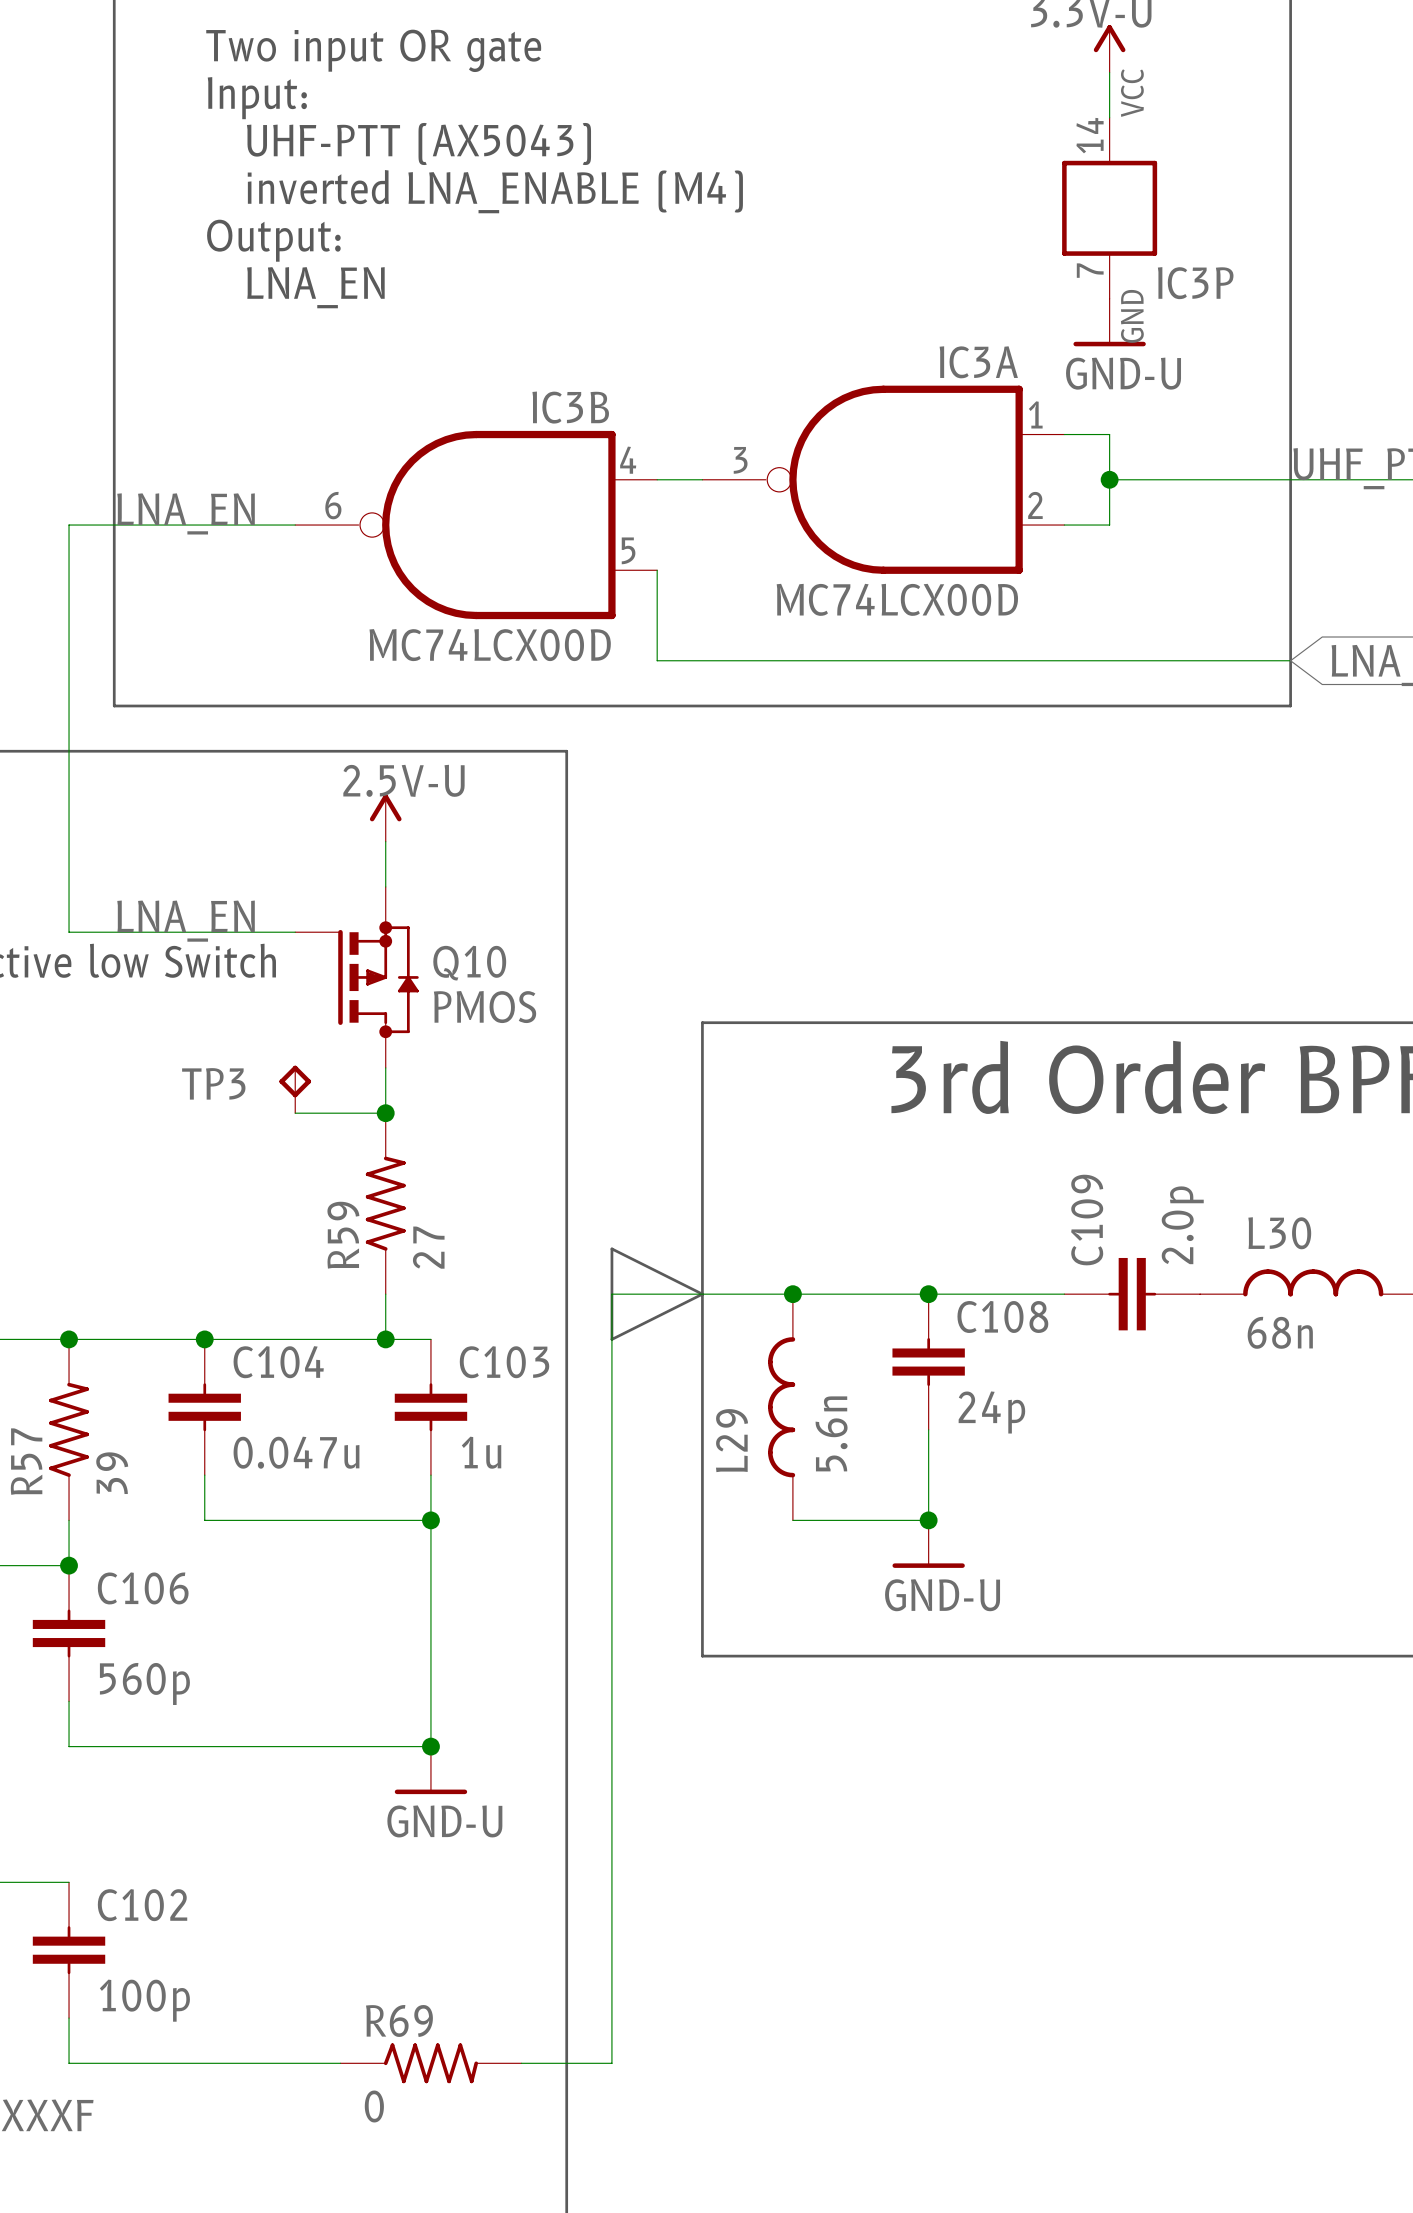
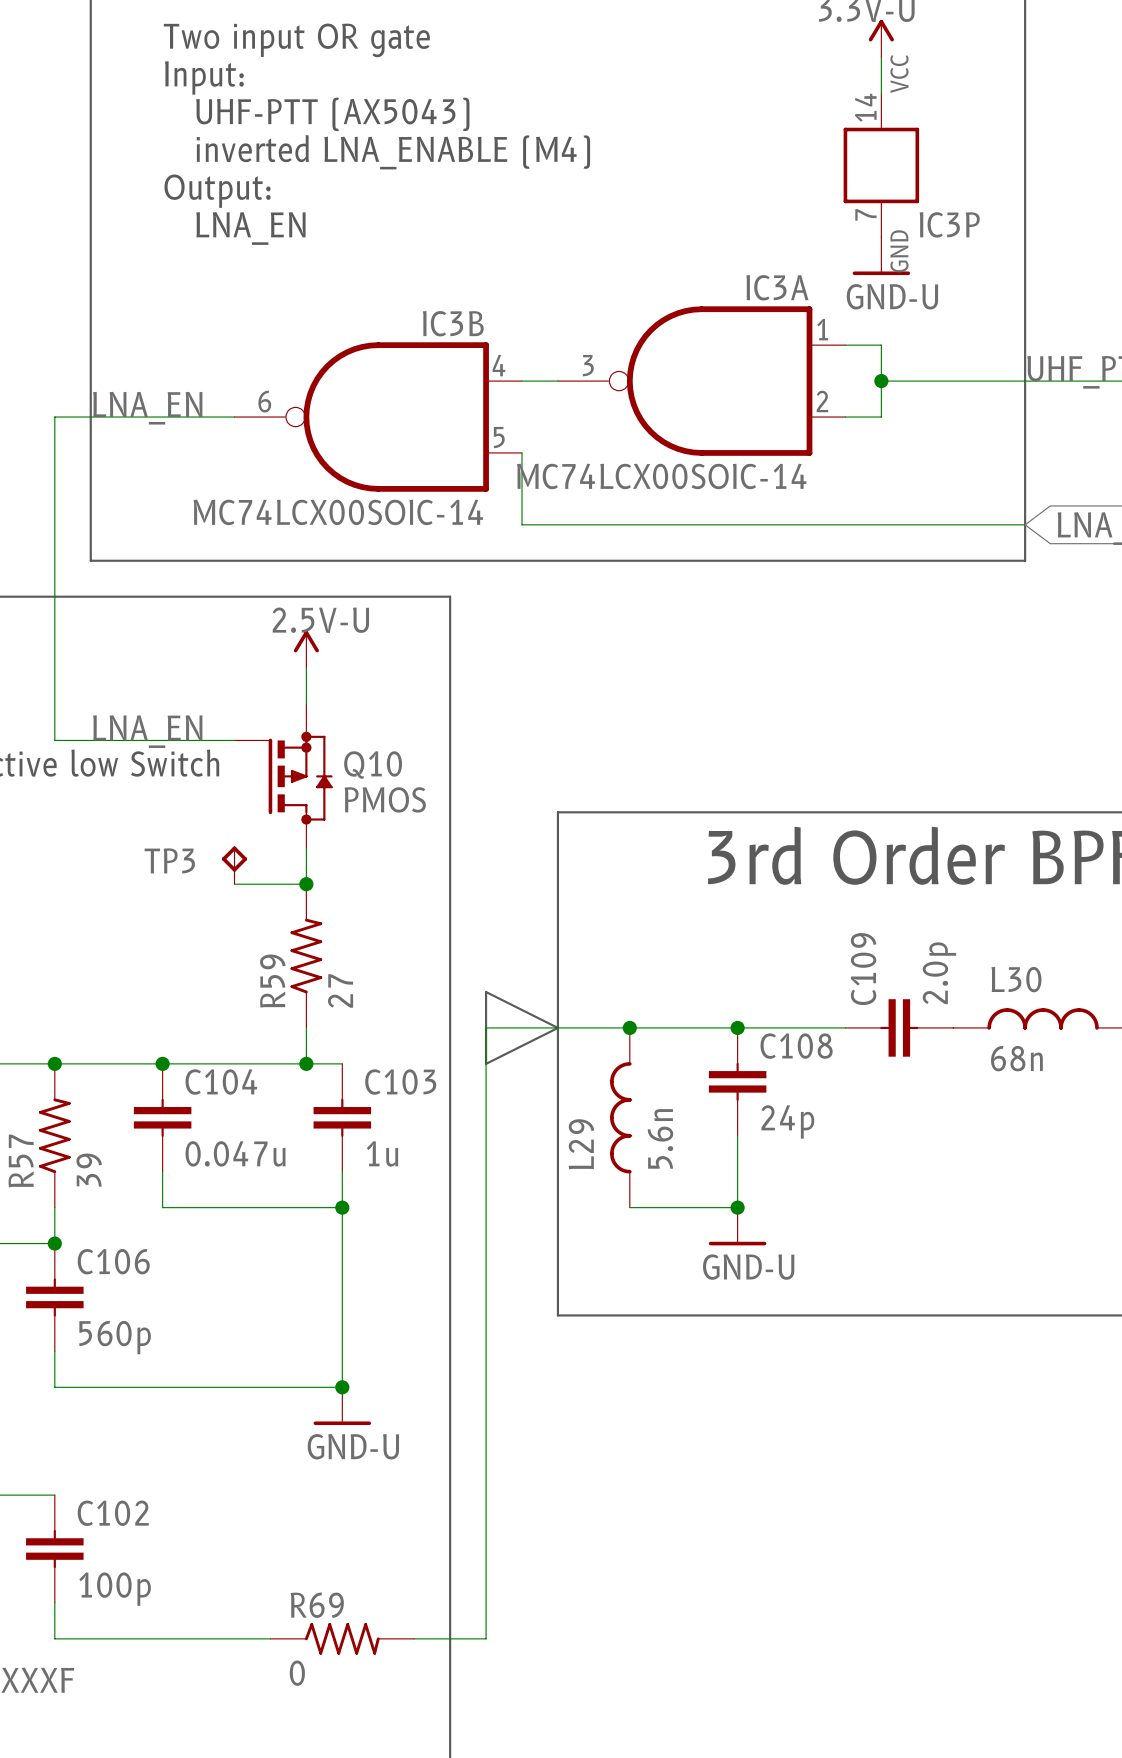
IC3A value: MC74LCX00D (897, 599) -> MC74LCX00SOIC-14 (661, 476)
IC3B value: MC74LCX00D (490, 645) -> MC74LCX00SOIC-14 (338, 512)

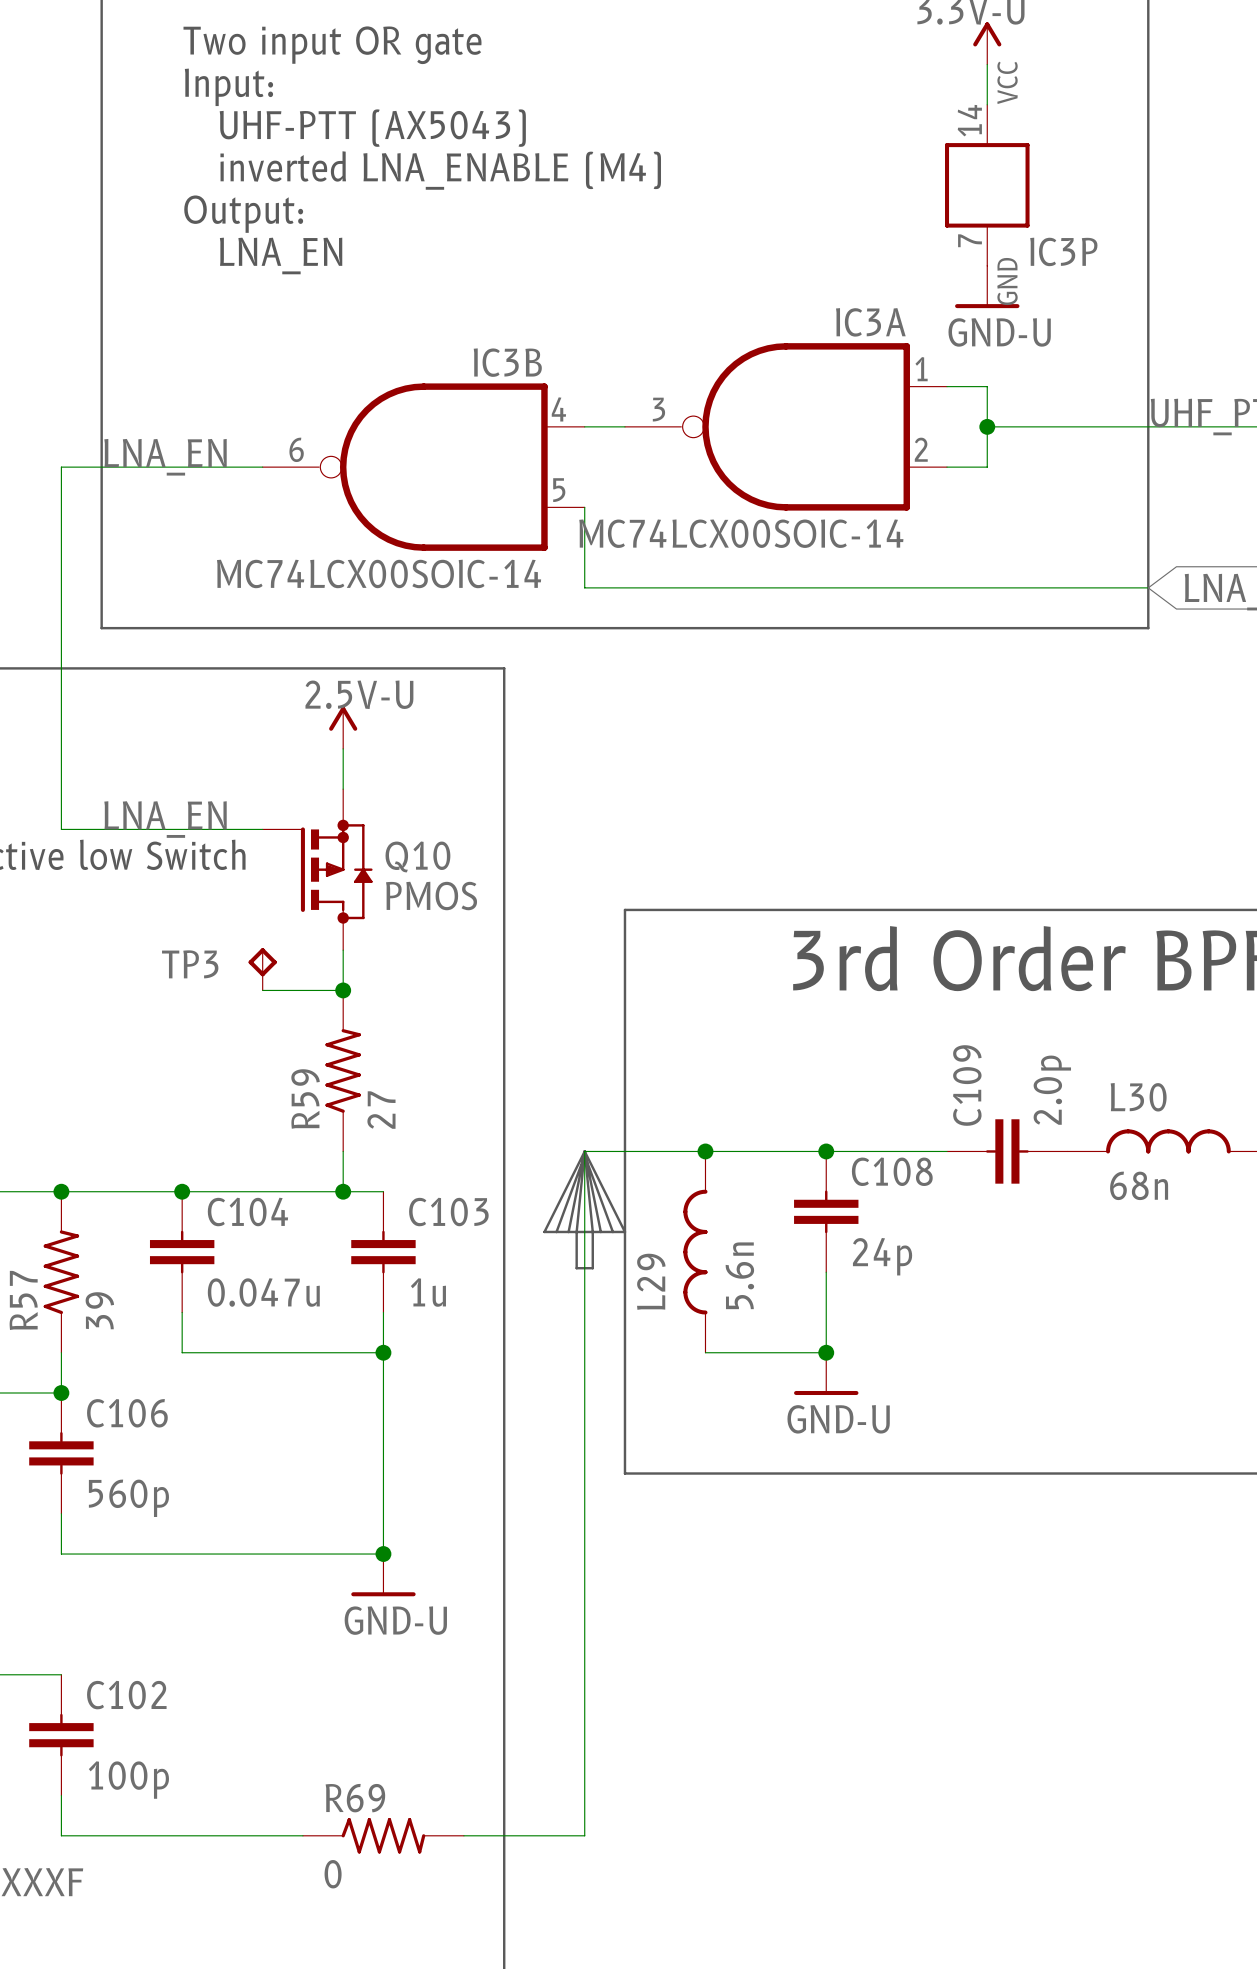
line: (486, 992) (557, 1027) (486, 1063) (486, 992) -> none
line: none -> (584, 1151) (544, 1231) (624, 1231) (584, 1151)
line: none -> (584, 1151) (568, 1231)
line: none -> (584, 1151) (600, 1231)
line: none -> (584, 1151) (576, 1231) (576, 1268) (592, 1268) (592, 1231) (584, 1151)
wire: (522, 1027) (486, 1027) (486, 1638) -> (584, 1151) (584, 1835) (544, 1835)
line: none -> (556, 1231) (584, 1155) (612, 1231)

